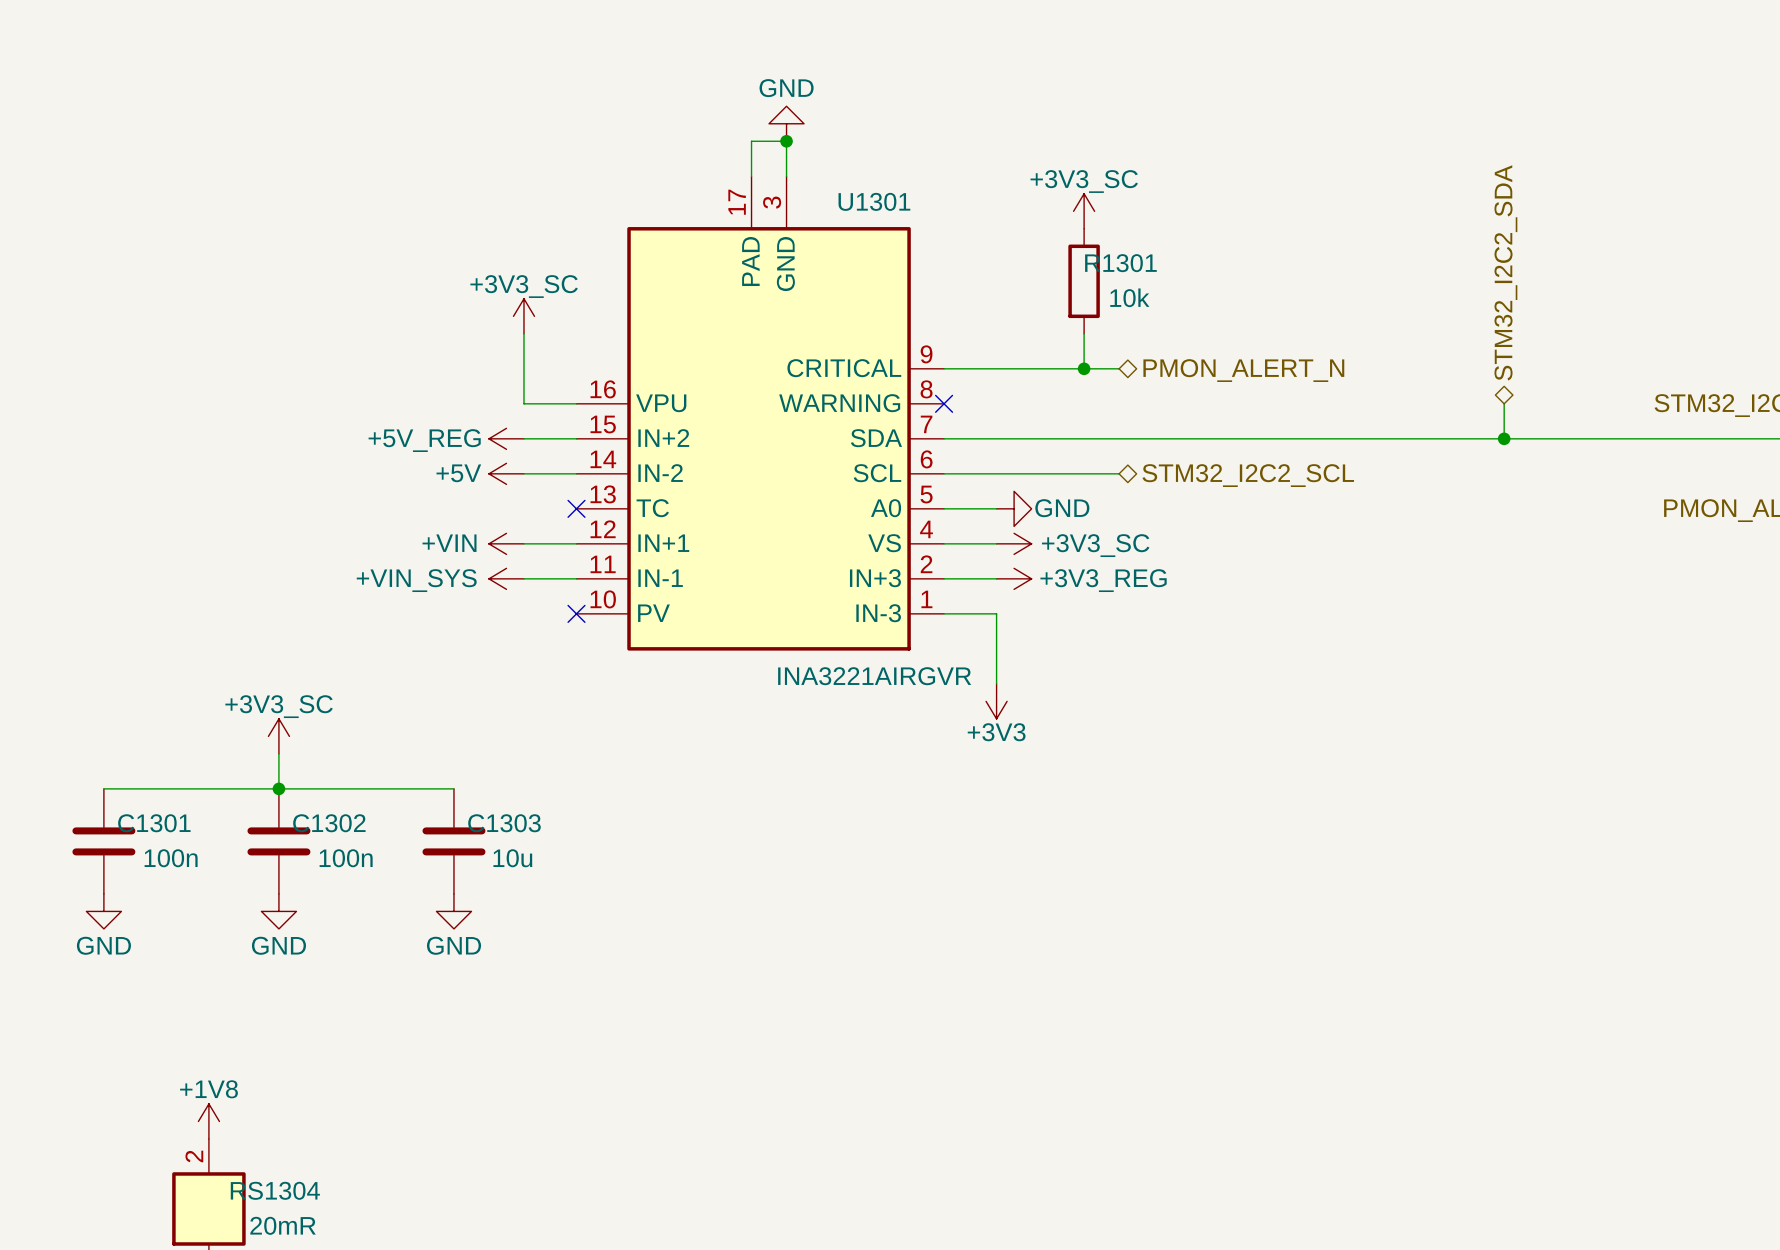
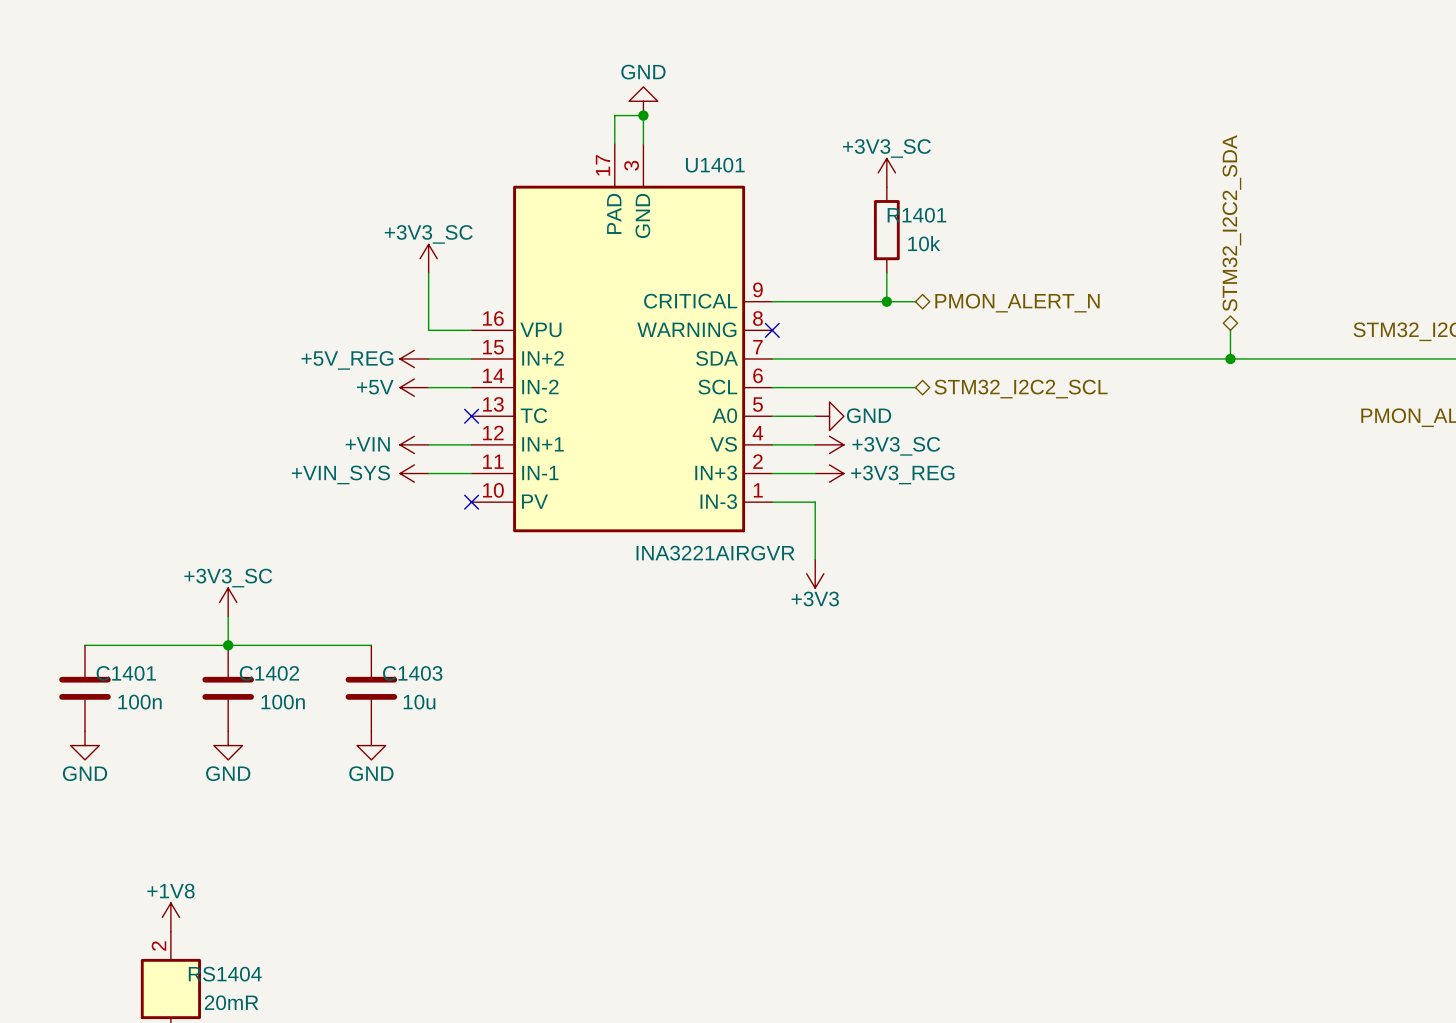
U1301 name: U1301 (874, 201) -> U1401 (715, 165)
R1301 name: R1301 (1120, 263) -> R1401 (916, 215)
C1301 name: C1301 (154, 823) -> C1401 (126, 673)
C1302 name: C1302 (329, 823) -> C1402 (269, 673)
C1303 name: C1303 (504, 823) -> C1403 (412, 673)
RS1304 name: RS1304 (275, 1190) -> RS1404 (225, 974)

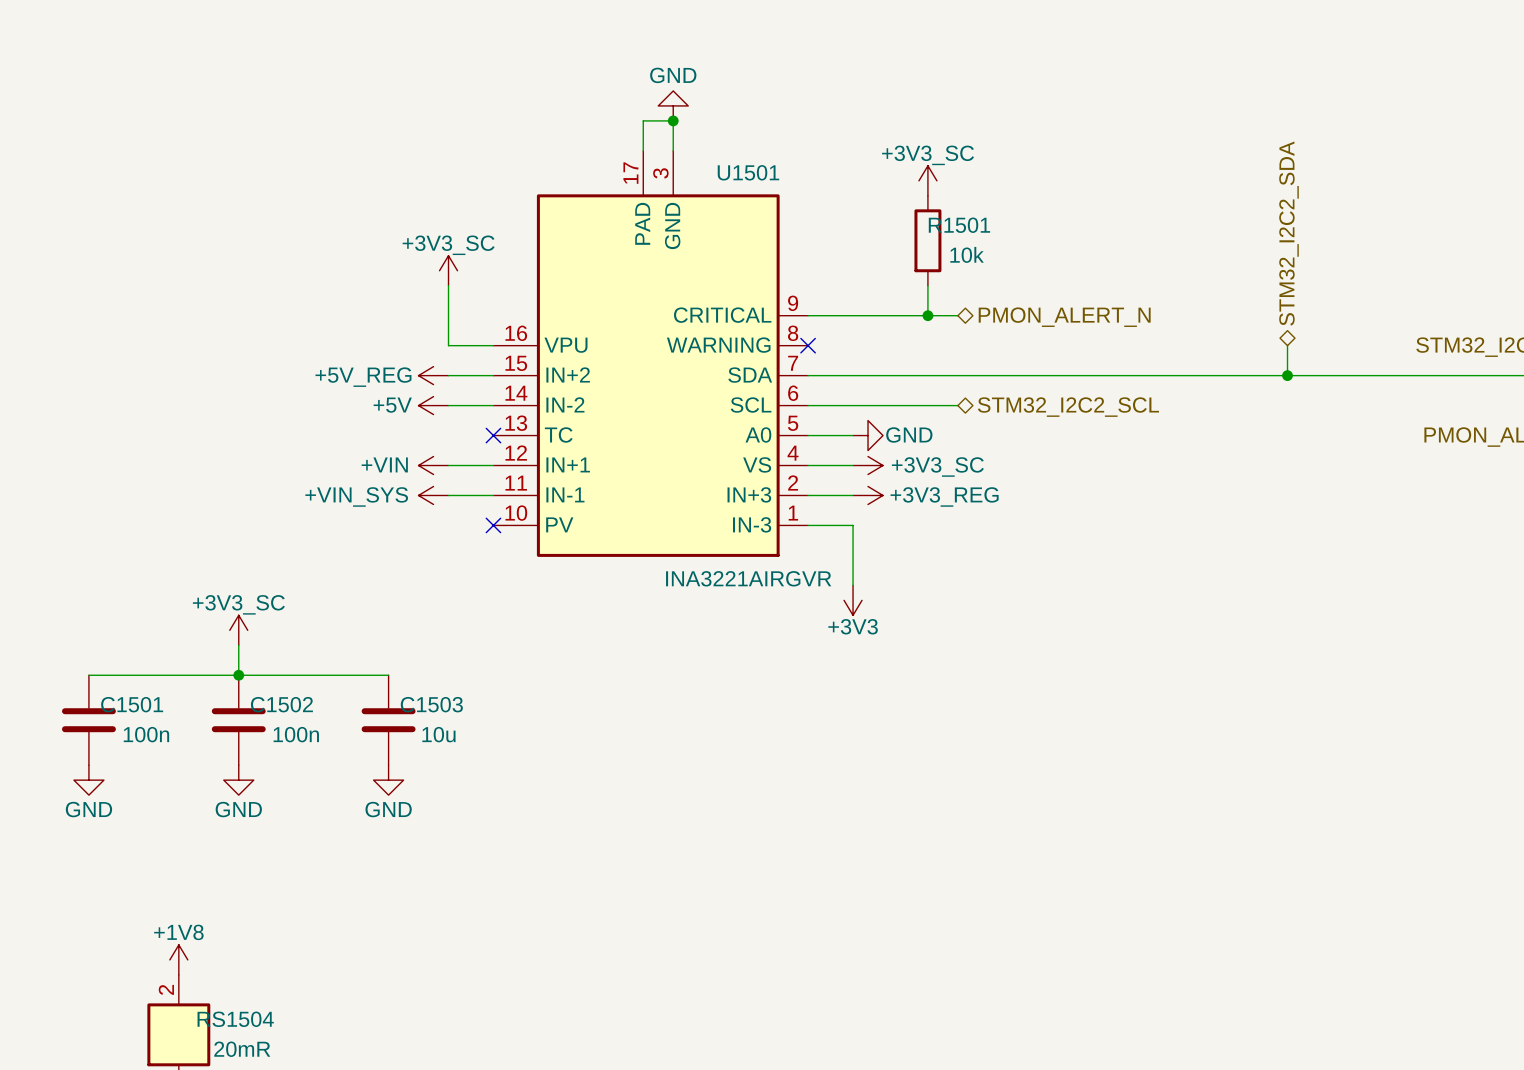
U1401 name: U1401 (715, 165) -> U1501 (748, 172)
R1401 name: R1401 (916, 215) -> R1501 (959, 225)
C1401 name: C1401 (126, 673) -> C1501 (132, 704)
C1402 name: C1402 (269, 673) -> C1502 (281, 704)
C1403 name: C1403 (412, 673) -> C1503 (431, 704)
RS1404 name: RS1404 (225, 974) -> RS1504 (235, 1019)

